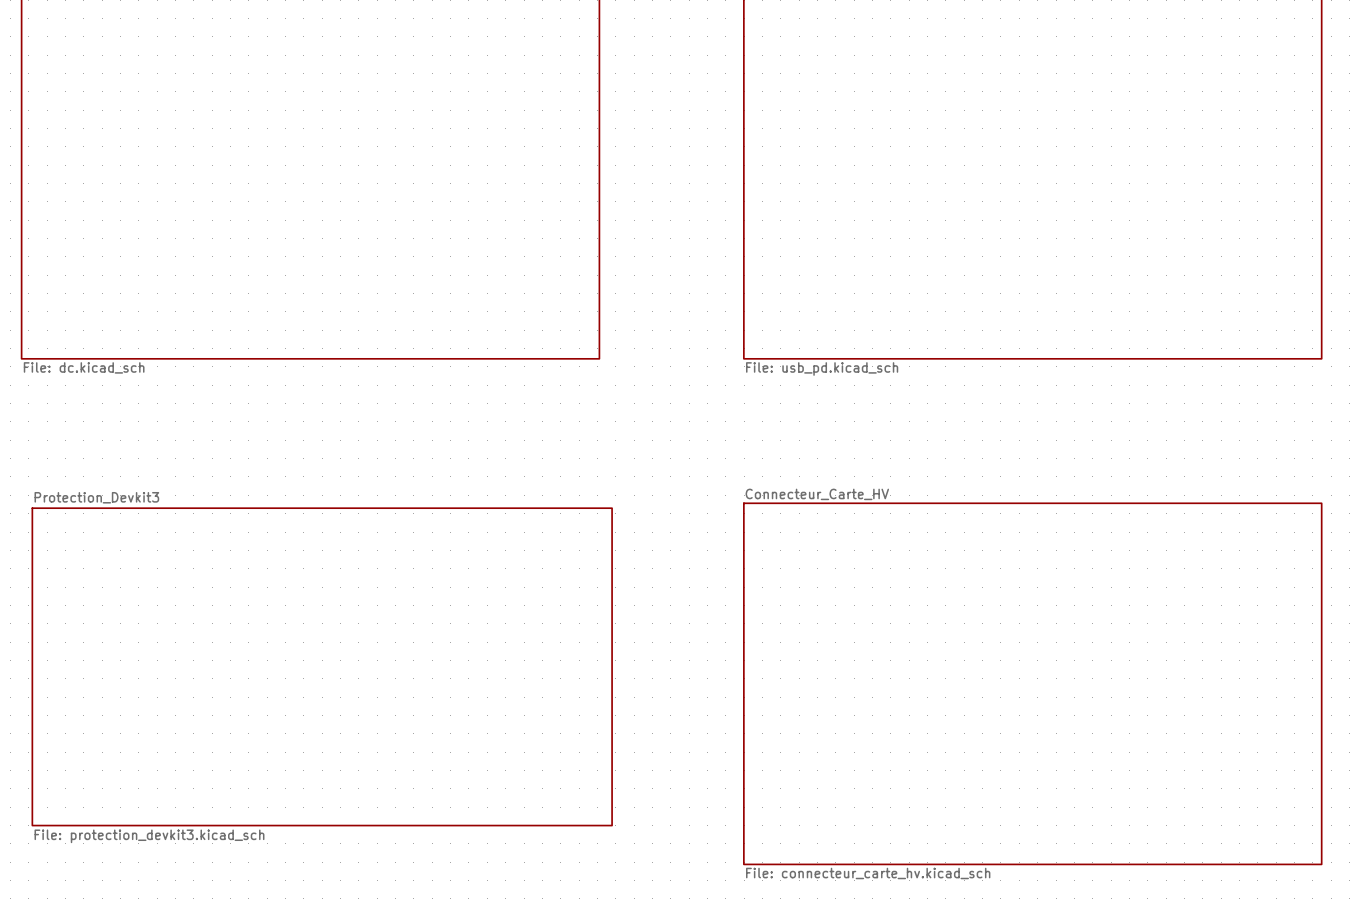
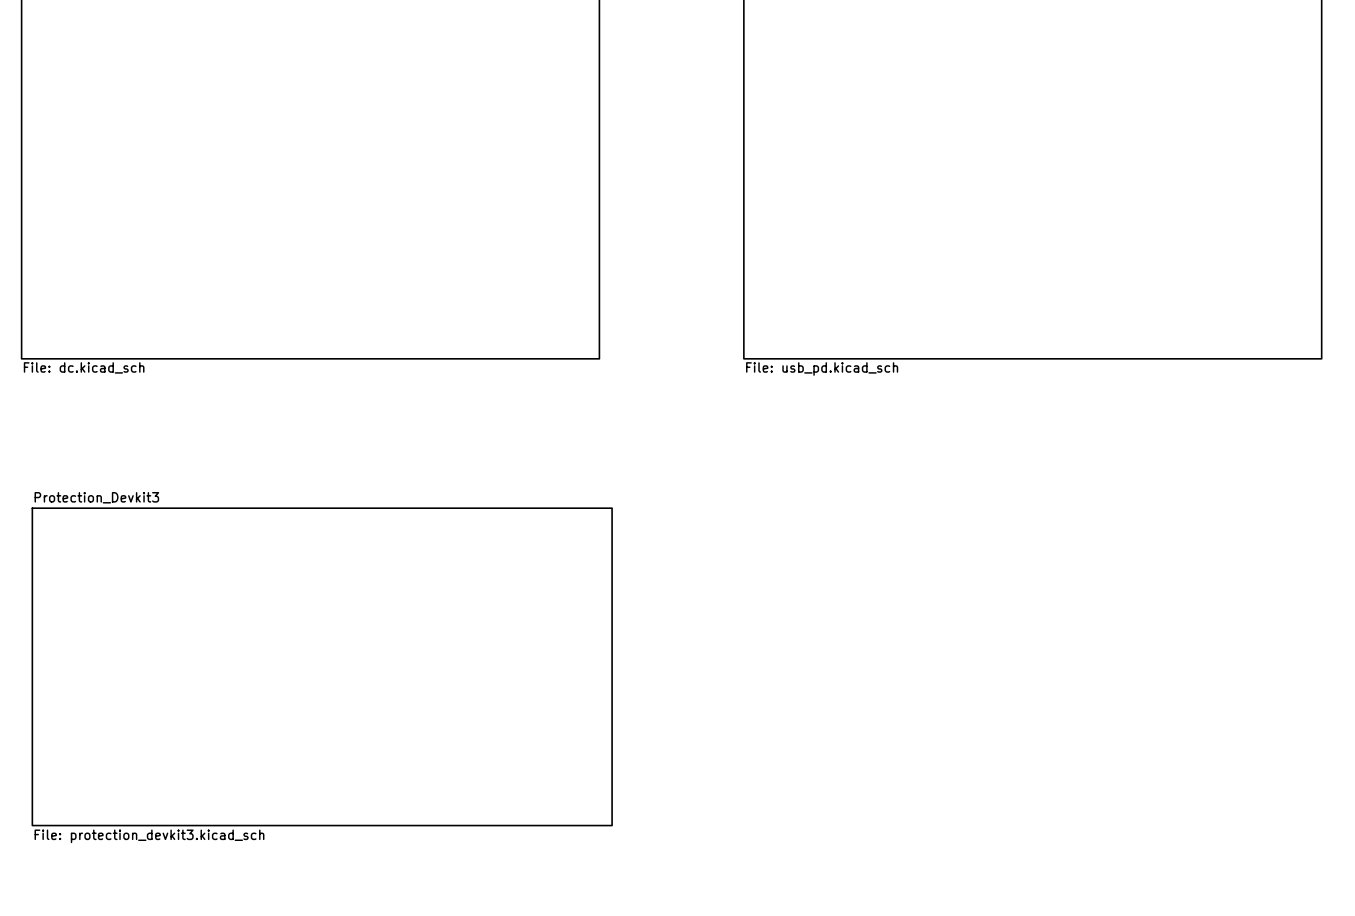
sheet Connecteur_Carte_HV: File: connecteur_carte_hv.kicad_sch (1032, 683) -> none

